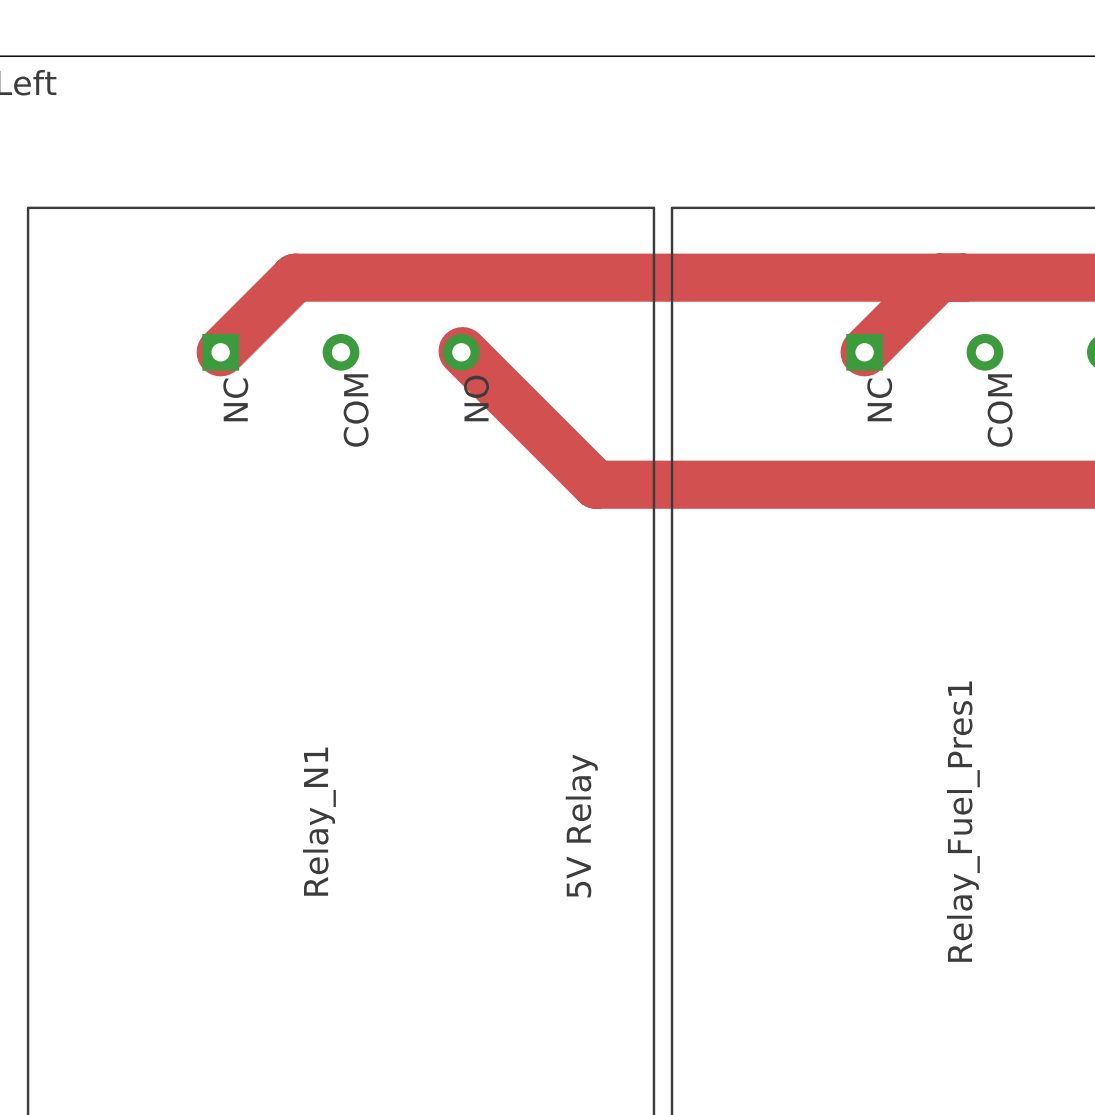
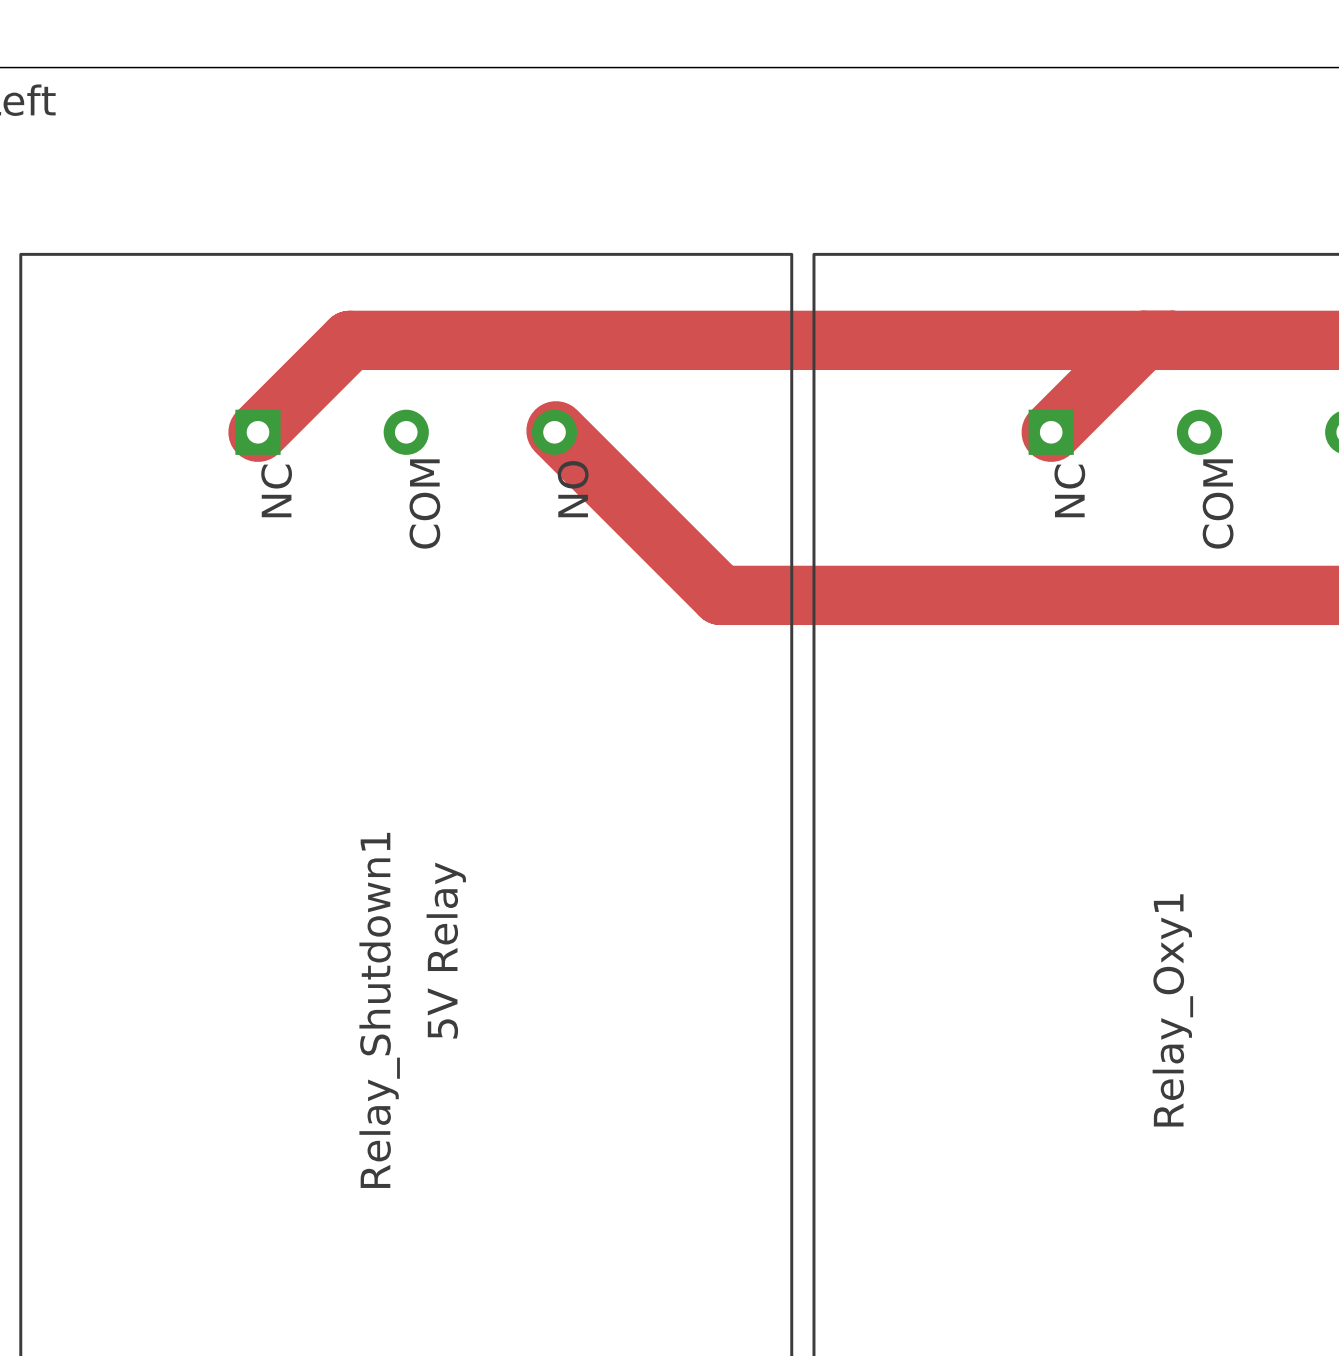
Relay_N1 name: Relay_N1 (319, 821) -> Relay_Shutdown1 (379, 1010)
Relay_Fuel_Pres1 name: Relay_Fuel_Pres1 (963, 821) -> Relay_Oxy1 (1172, 1010)
Relay_N1 text position: 5V Relay (581, 826) -> 5V Relay (446, 950)

